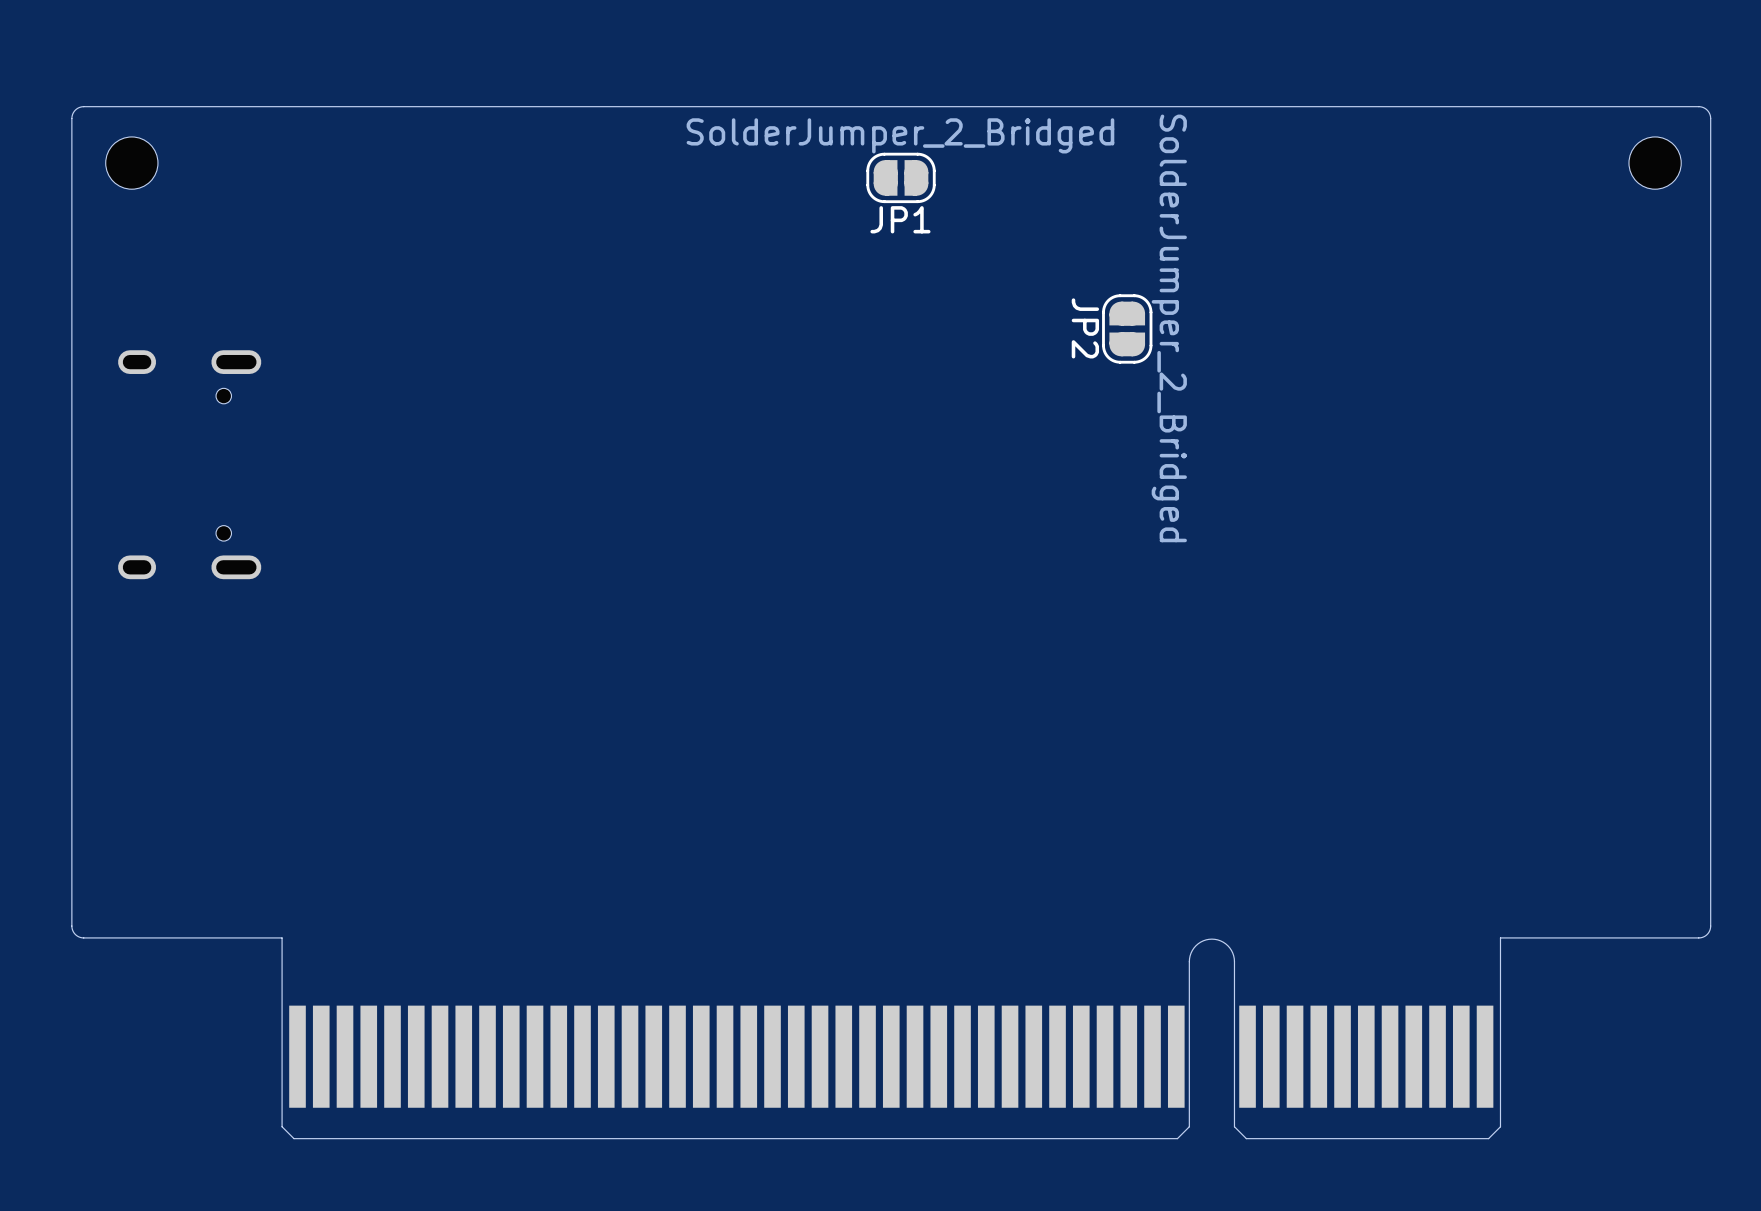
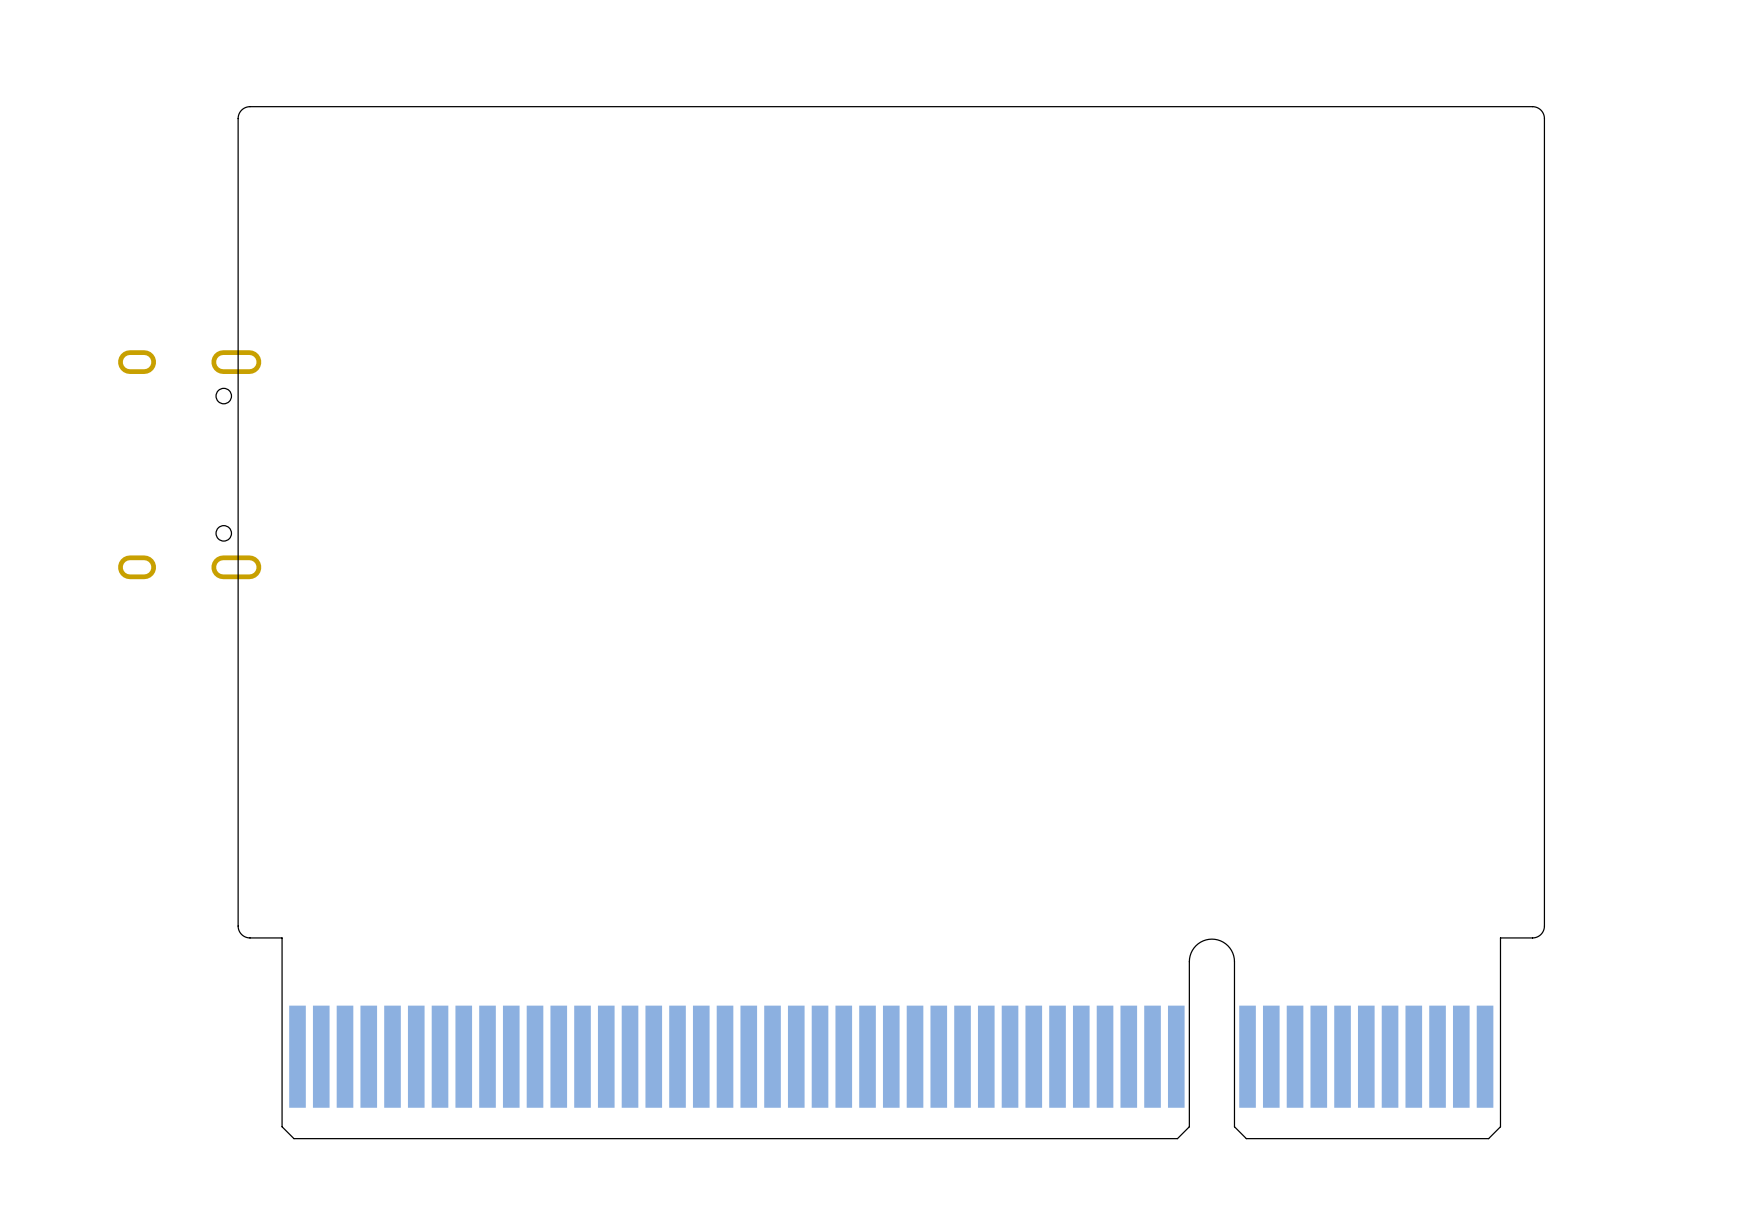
part footprint: [71, 106, 1712, 1140] -> [237, 106, 1546, 1140]
part: (131, 163) -> none
part: (1655, 163) -> none
JP1: SolderJumper_2_Bridged (901, 177) -> none
JP2: SolderJumper_2_Bridged (1127, 328) -> none

